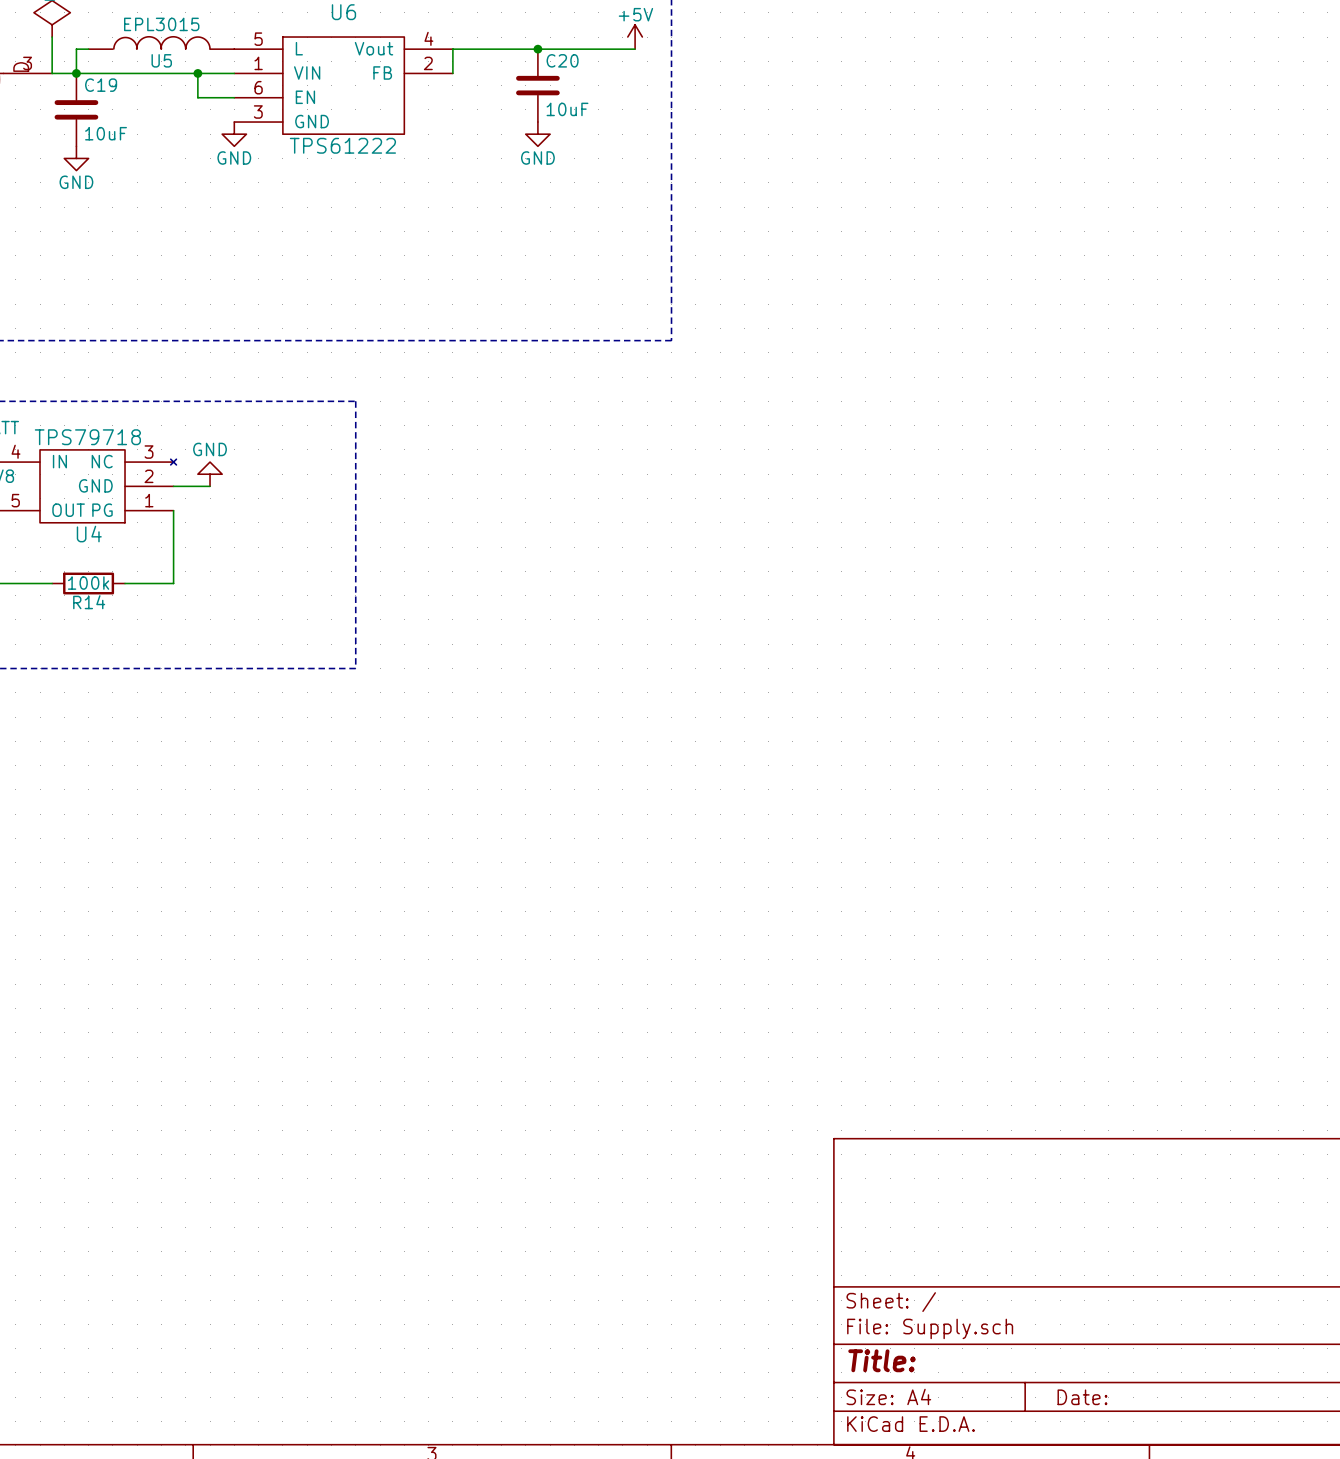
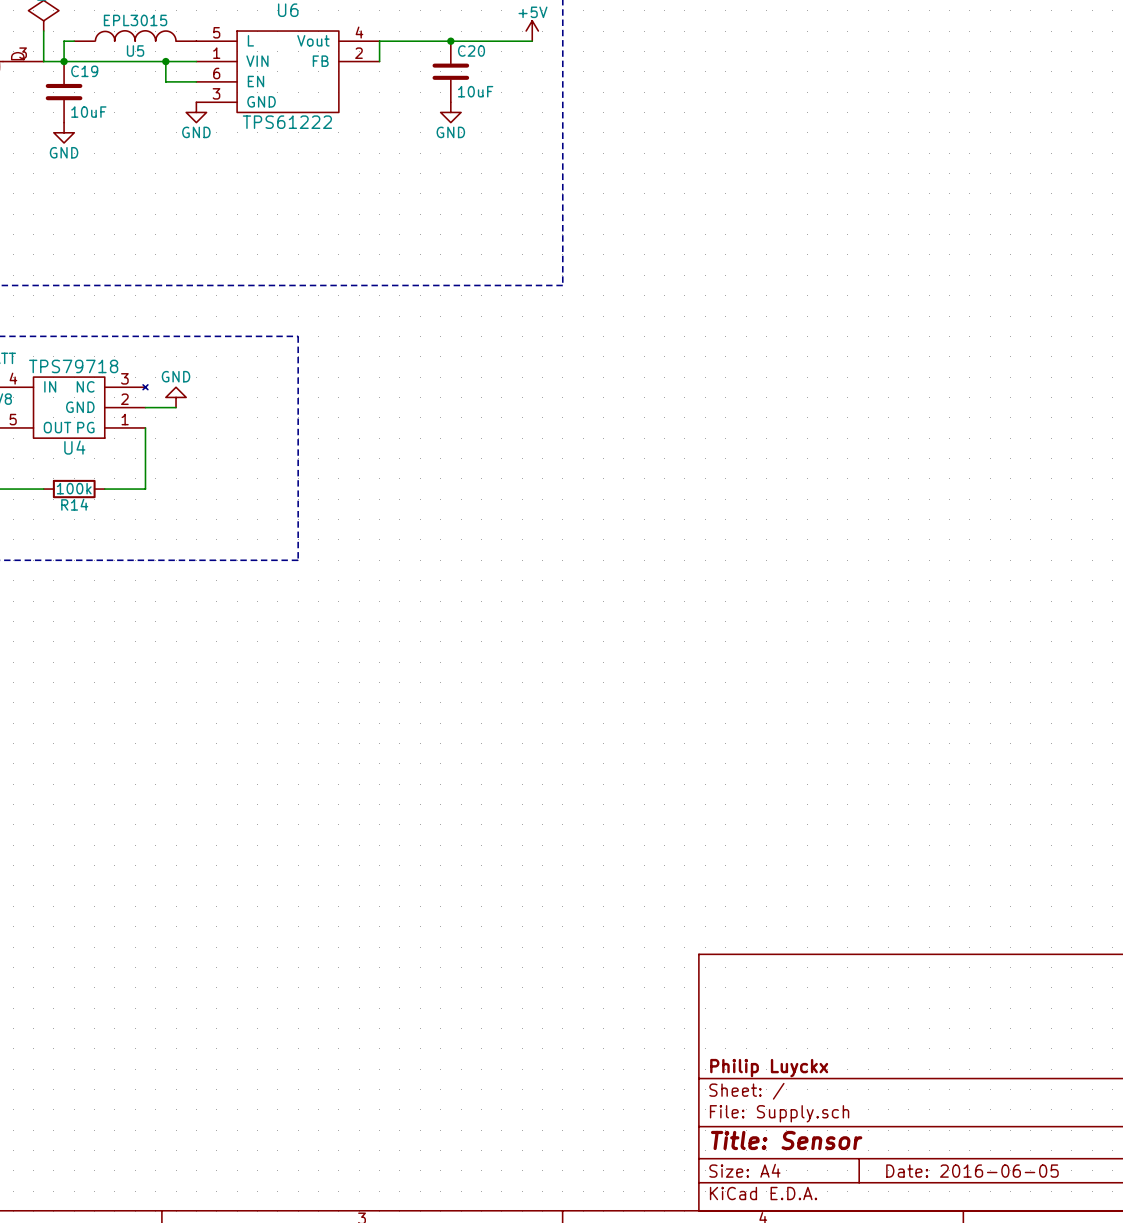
title block: none -> Philip Luyckx (769, 1068)
title block: Title: (882, 1360) -> Title: Sensor (786, 1140)
title block: Date: (1082, 1397) -> Date: 2016-06-05 (972, 1171)

